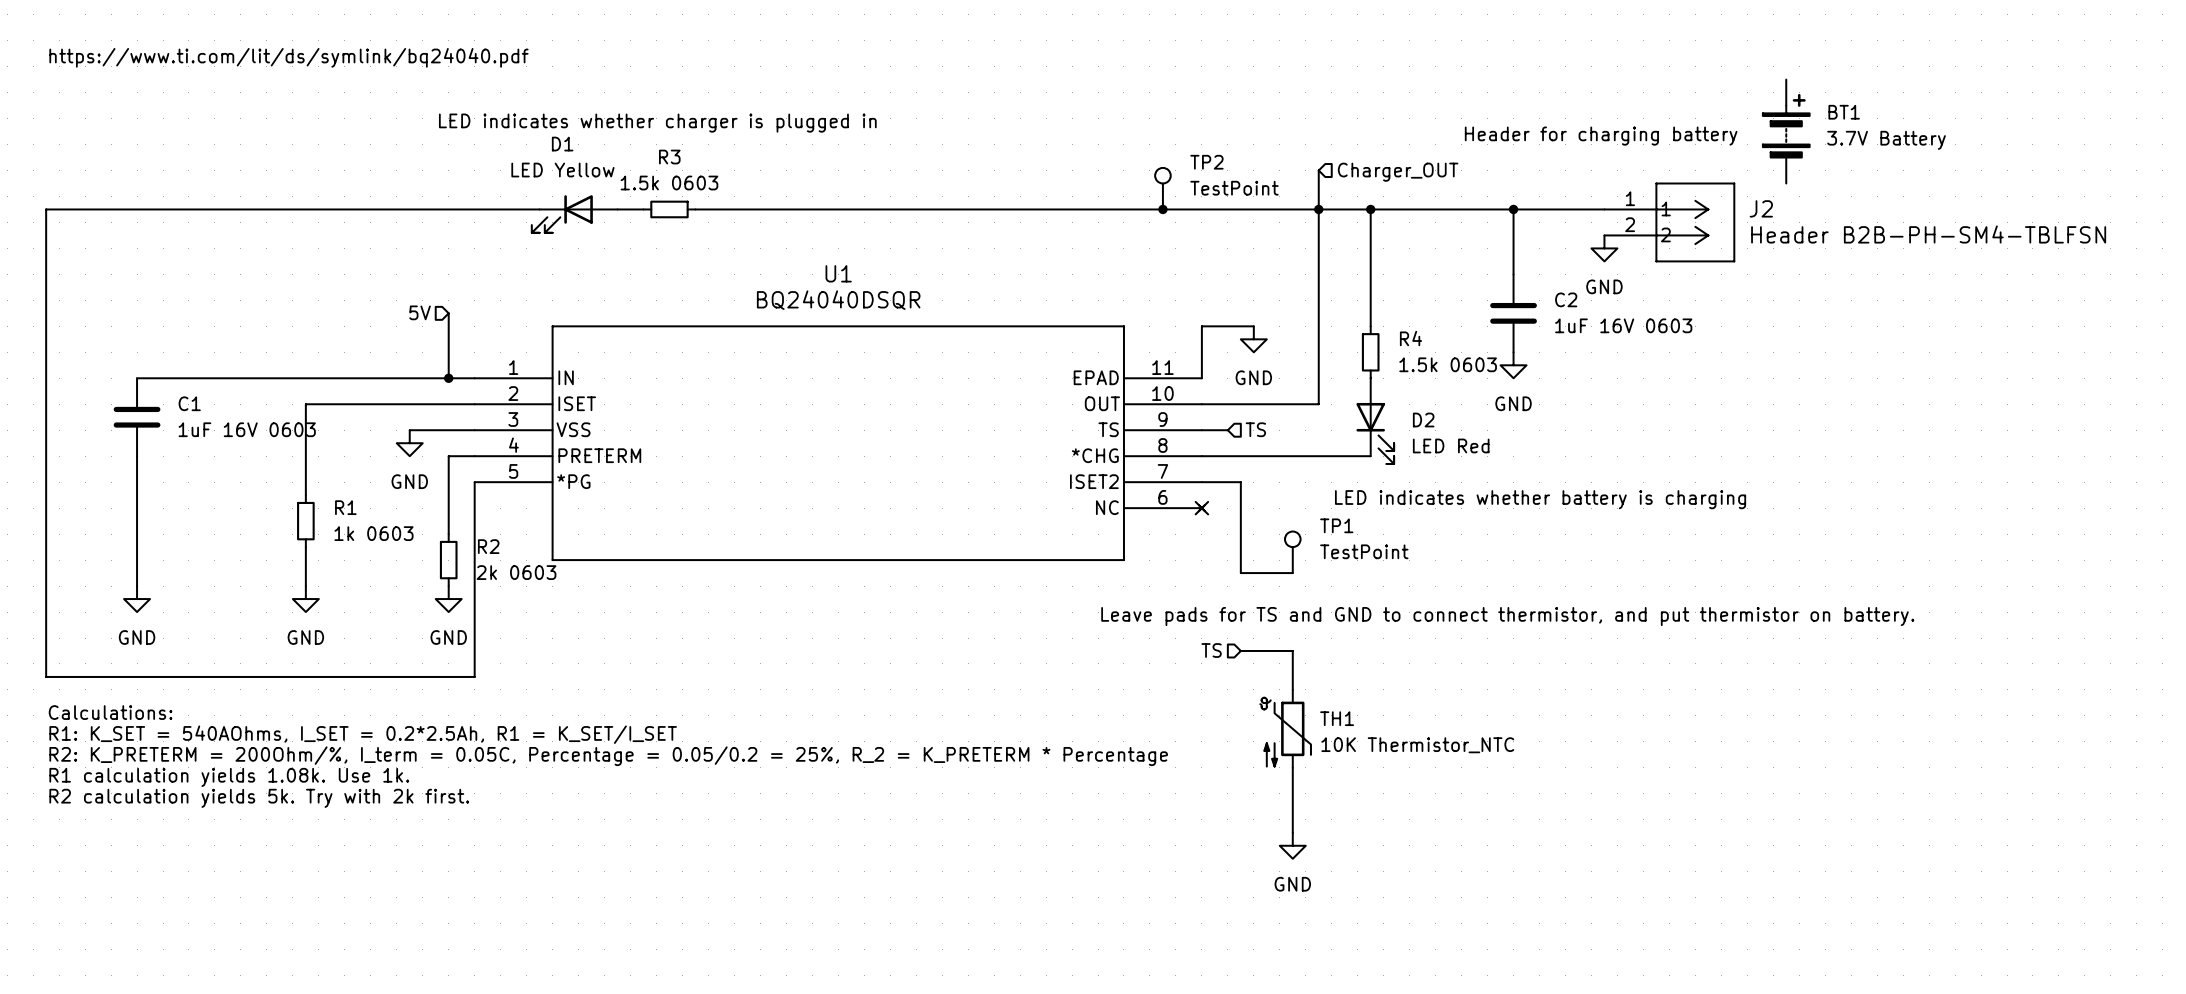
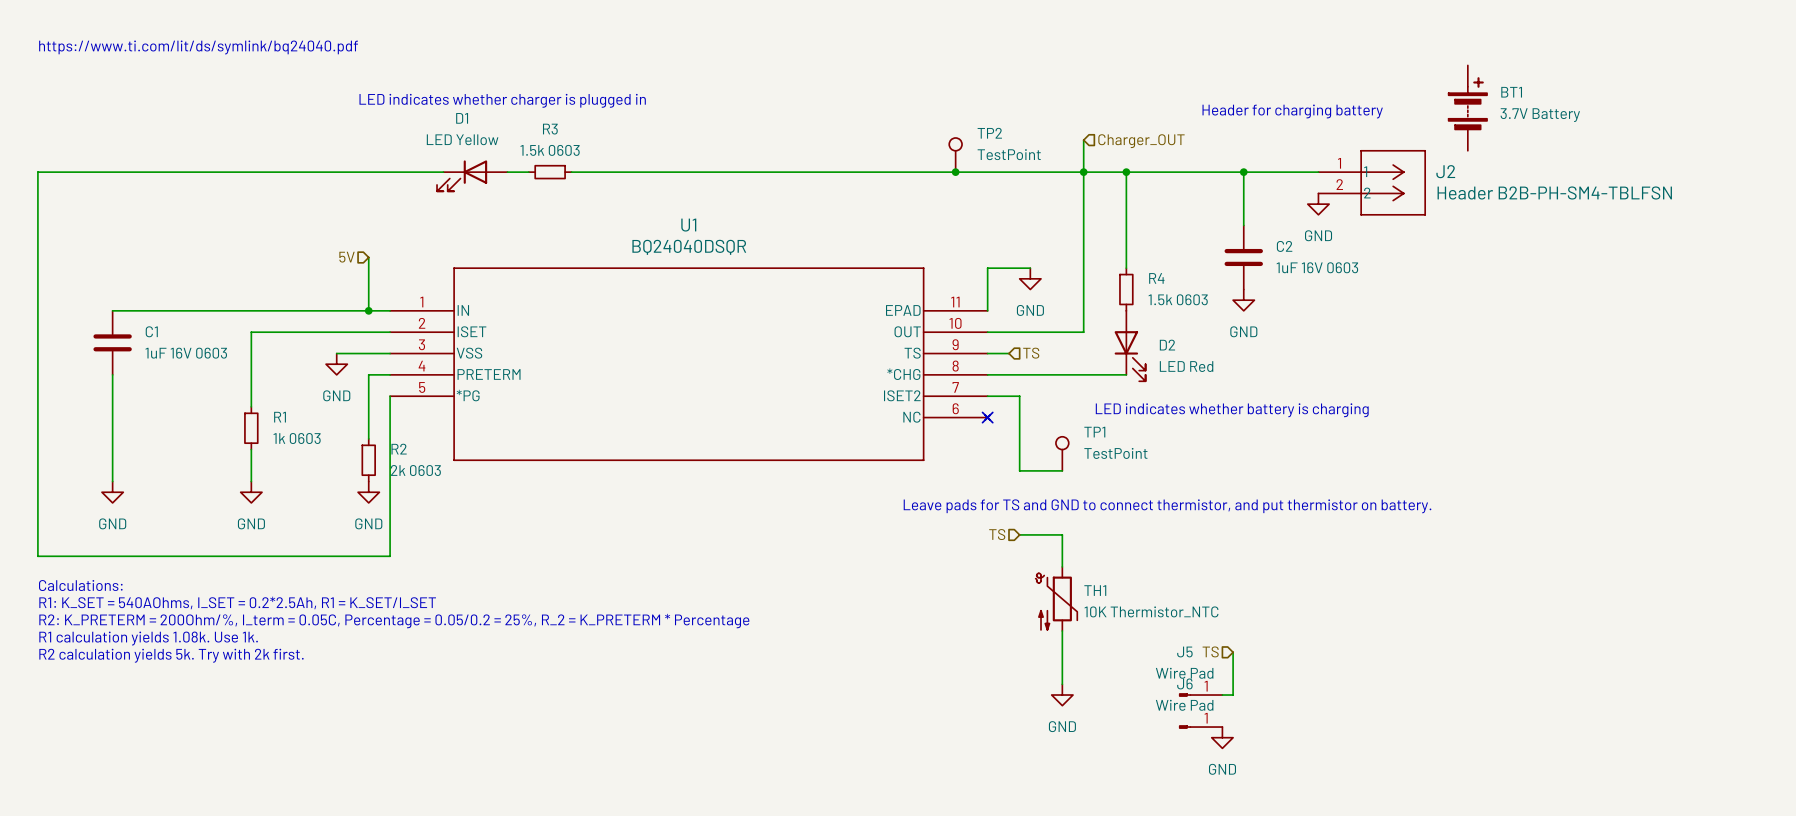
hierarchical label: none -> TS (1210, 651)
wire: none -> (1233, 652) (1233, 695) (1222, 695)
J5: none -> Wire Pad (1200, 695)
J6: none -> Wire Pad (1200, 727)
power symbol: none -> GND (1222, 737)

